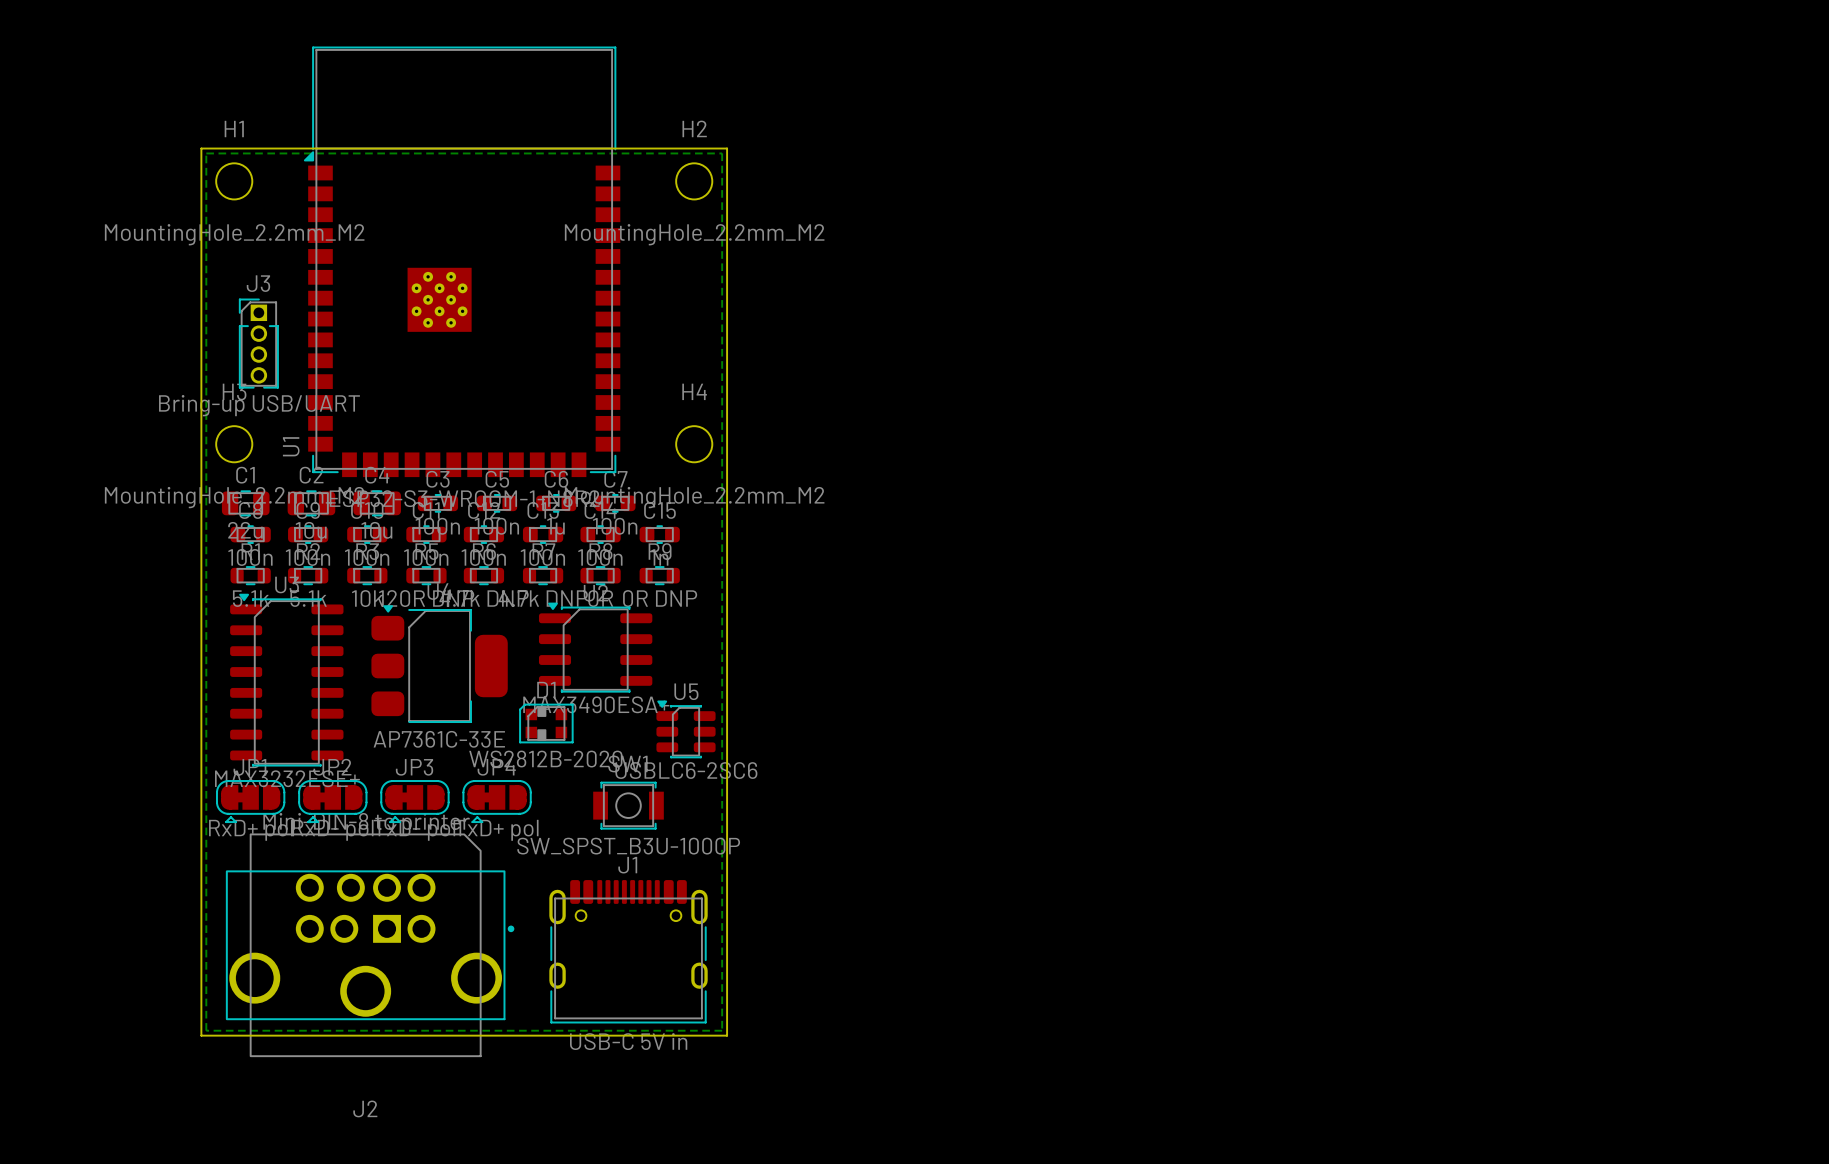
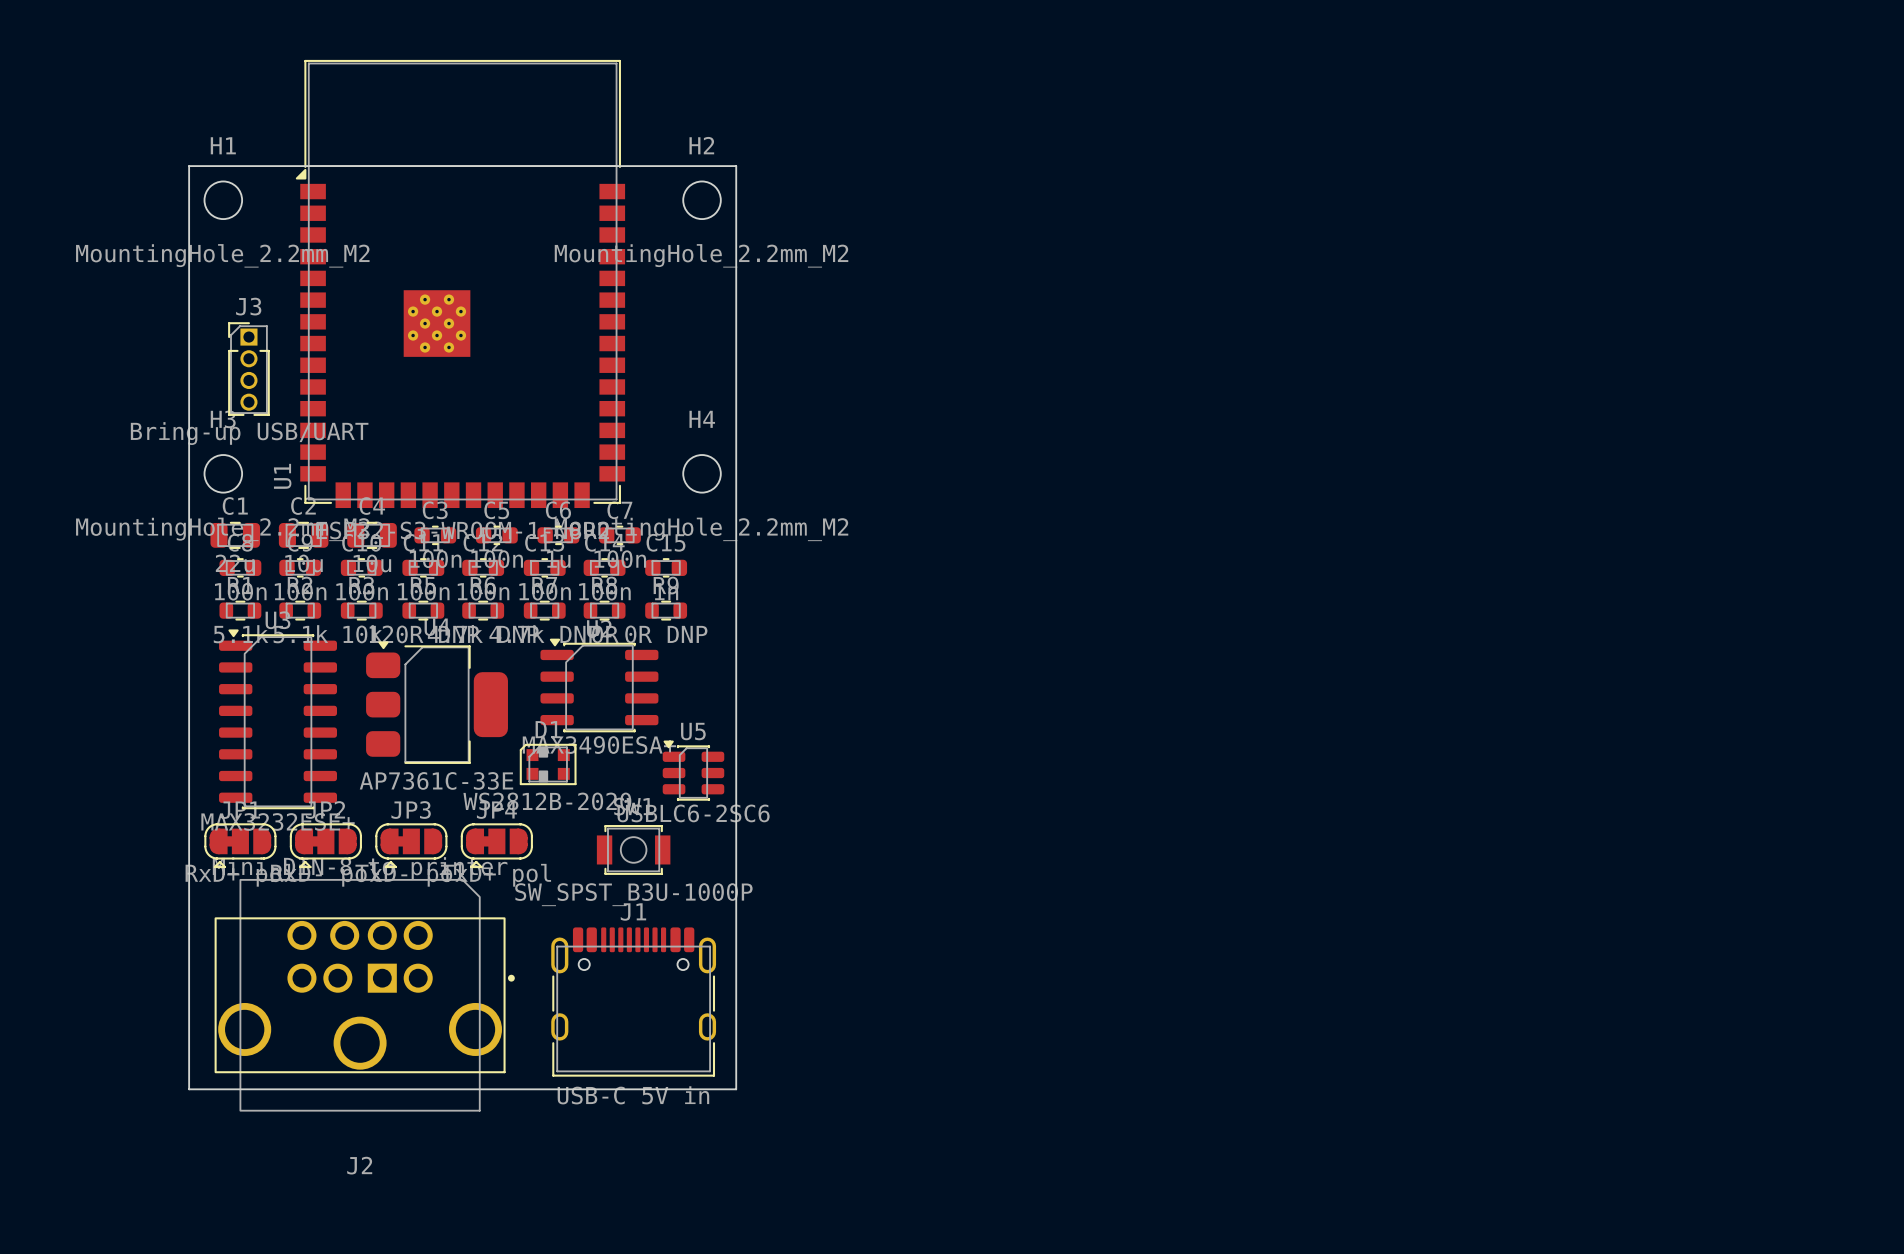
bottom zone outline: (206, 153) (722, 153) (722, 1030) (206, 1030) (206, 153) -> none

